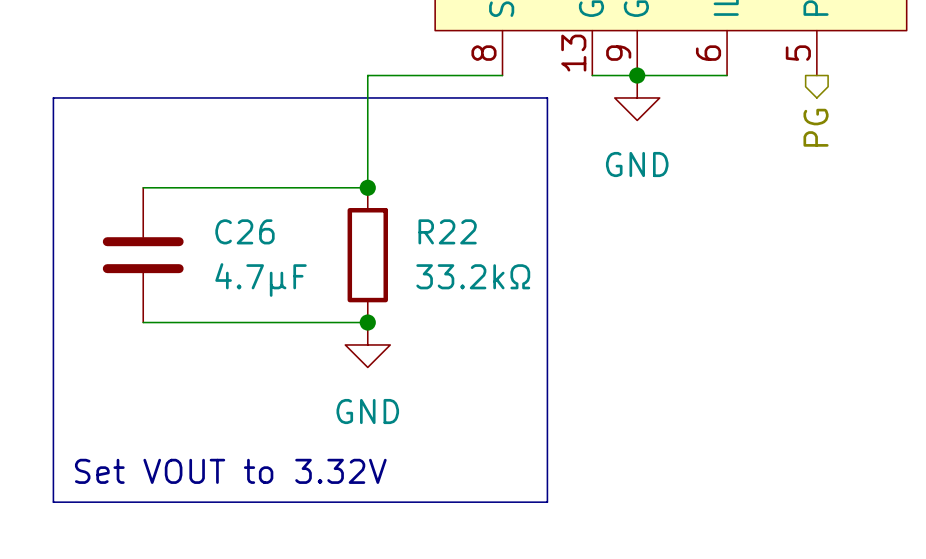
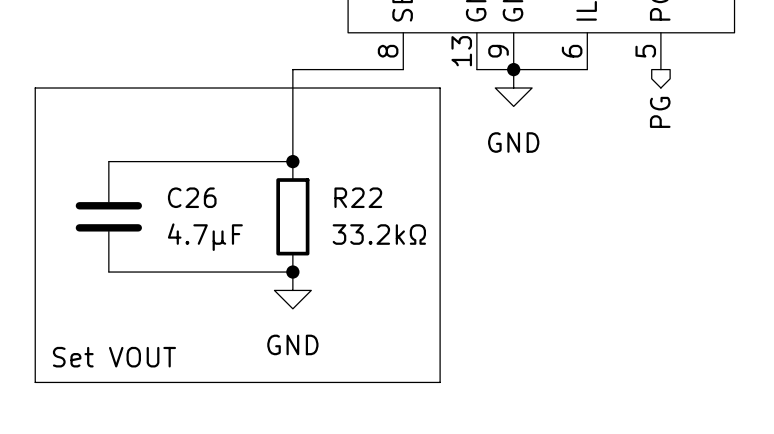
line: (53, 457) (53, 502) (547, 502) (547, 457) -> (35, 382) (440, 382)
text: Set VOUT to 3.32V (230, 471) -> Set VOUT (114, 357)

